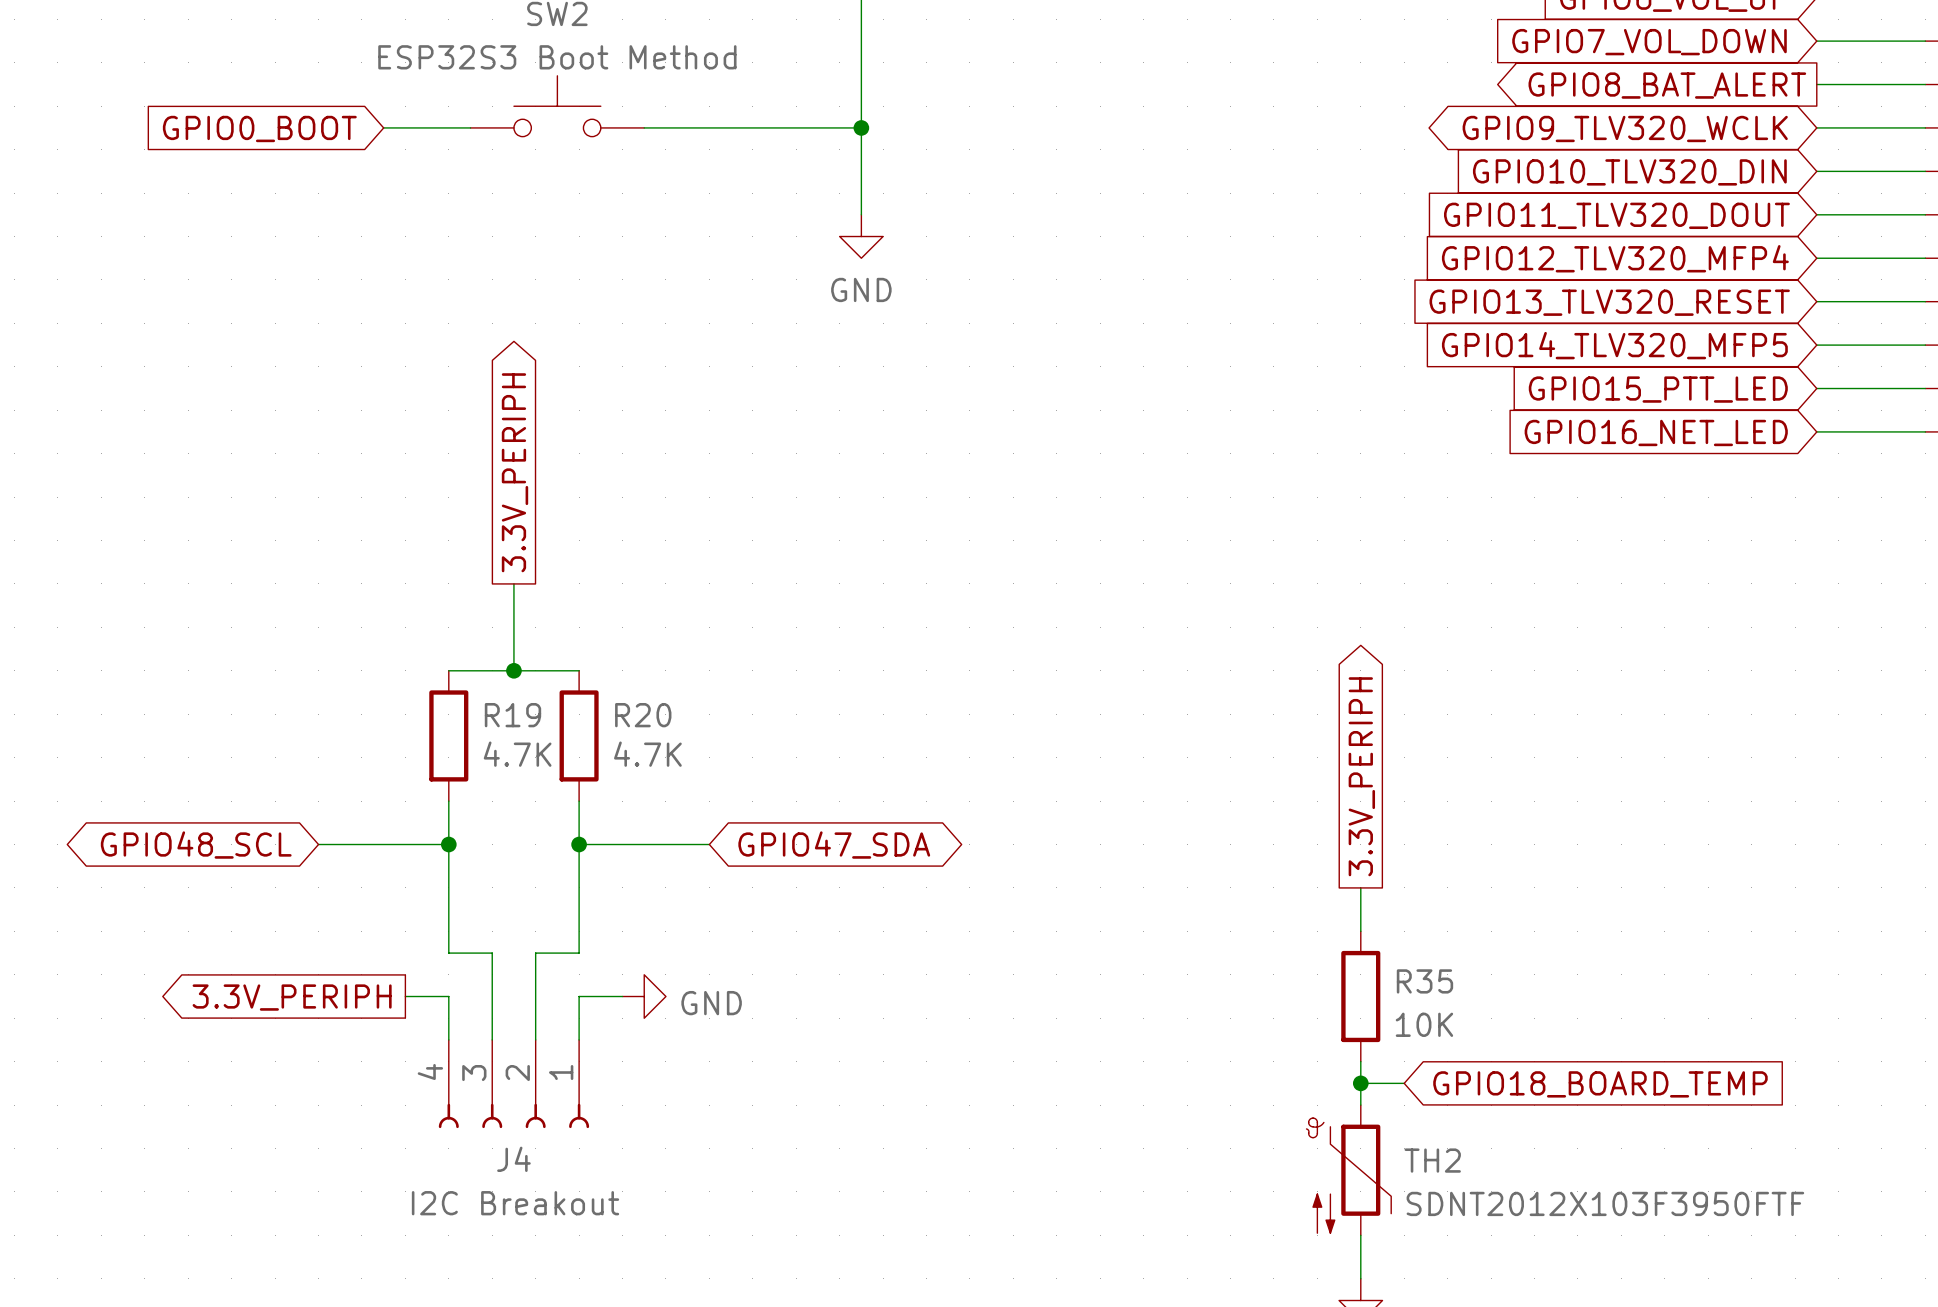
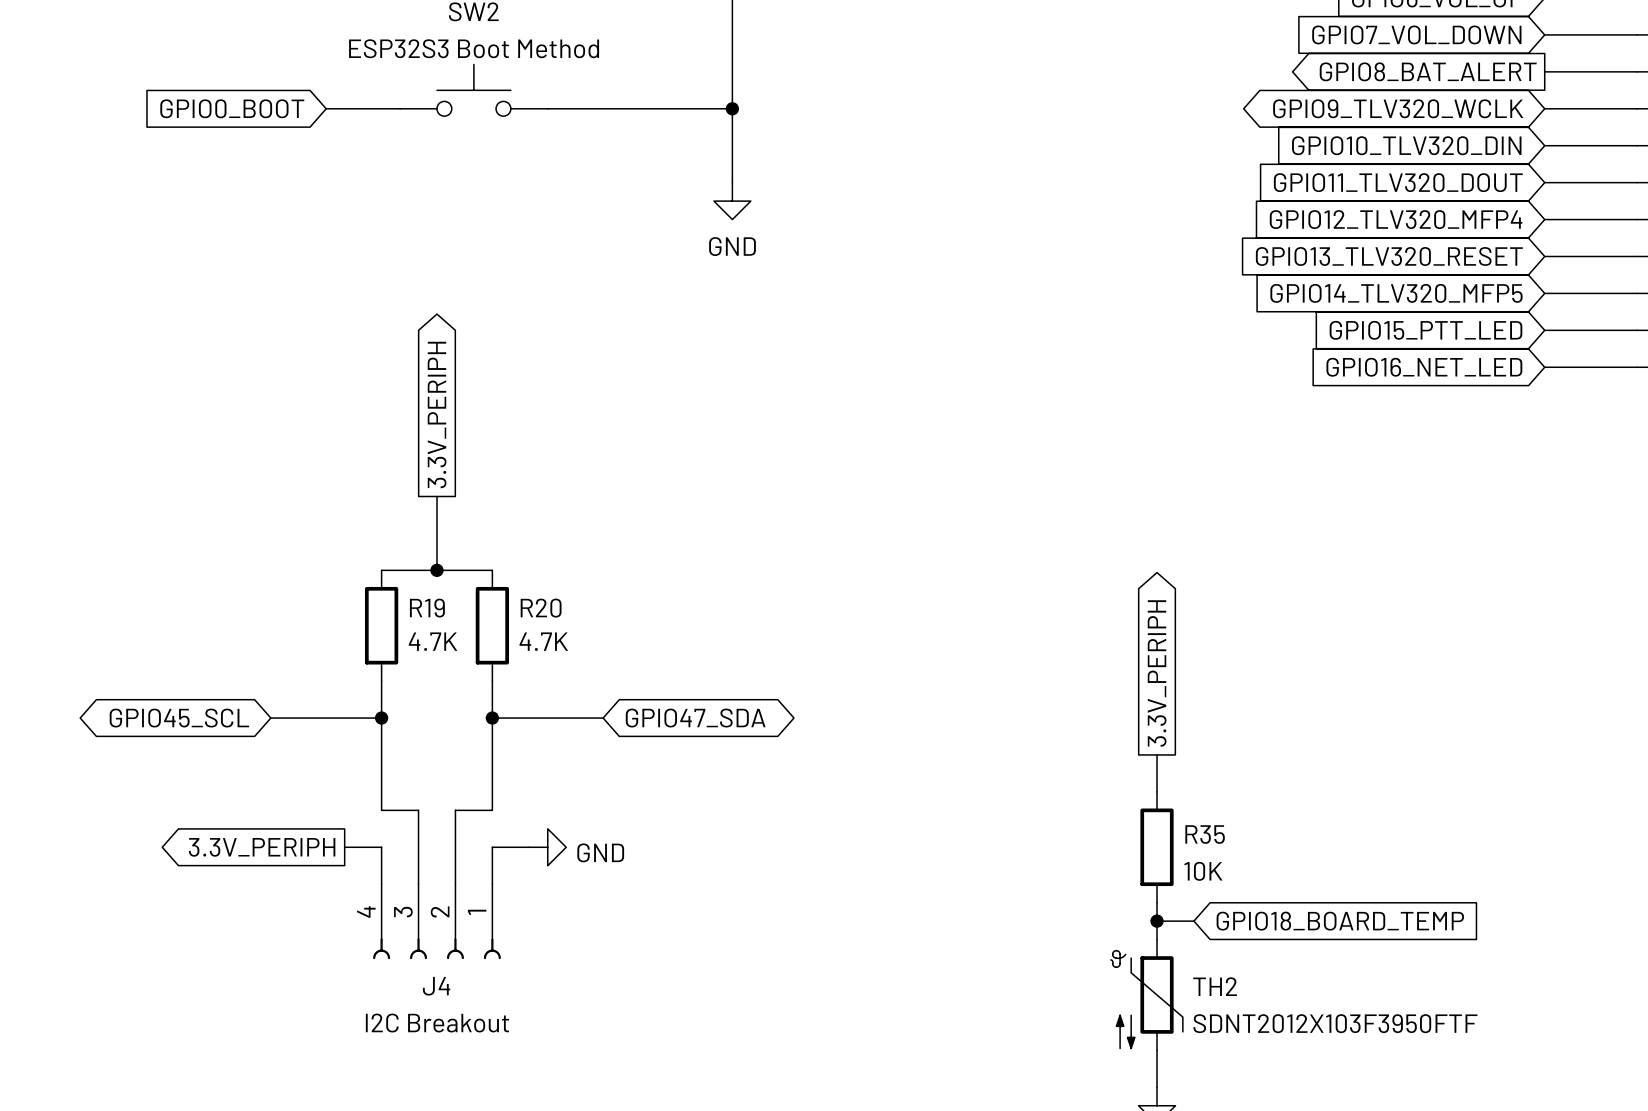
global label: GPIO48_SCL (196, 845) -> GPIO45_SCL (179, 718)

